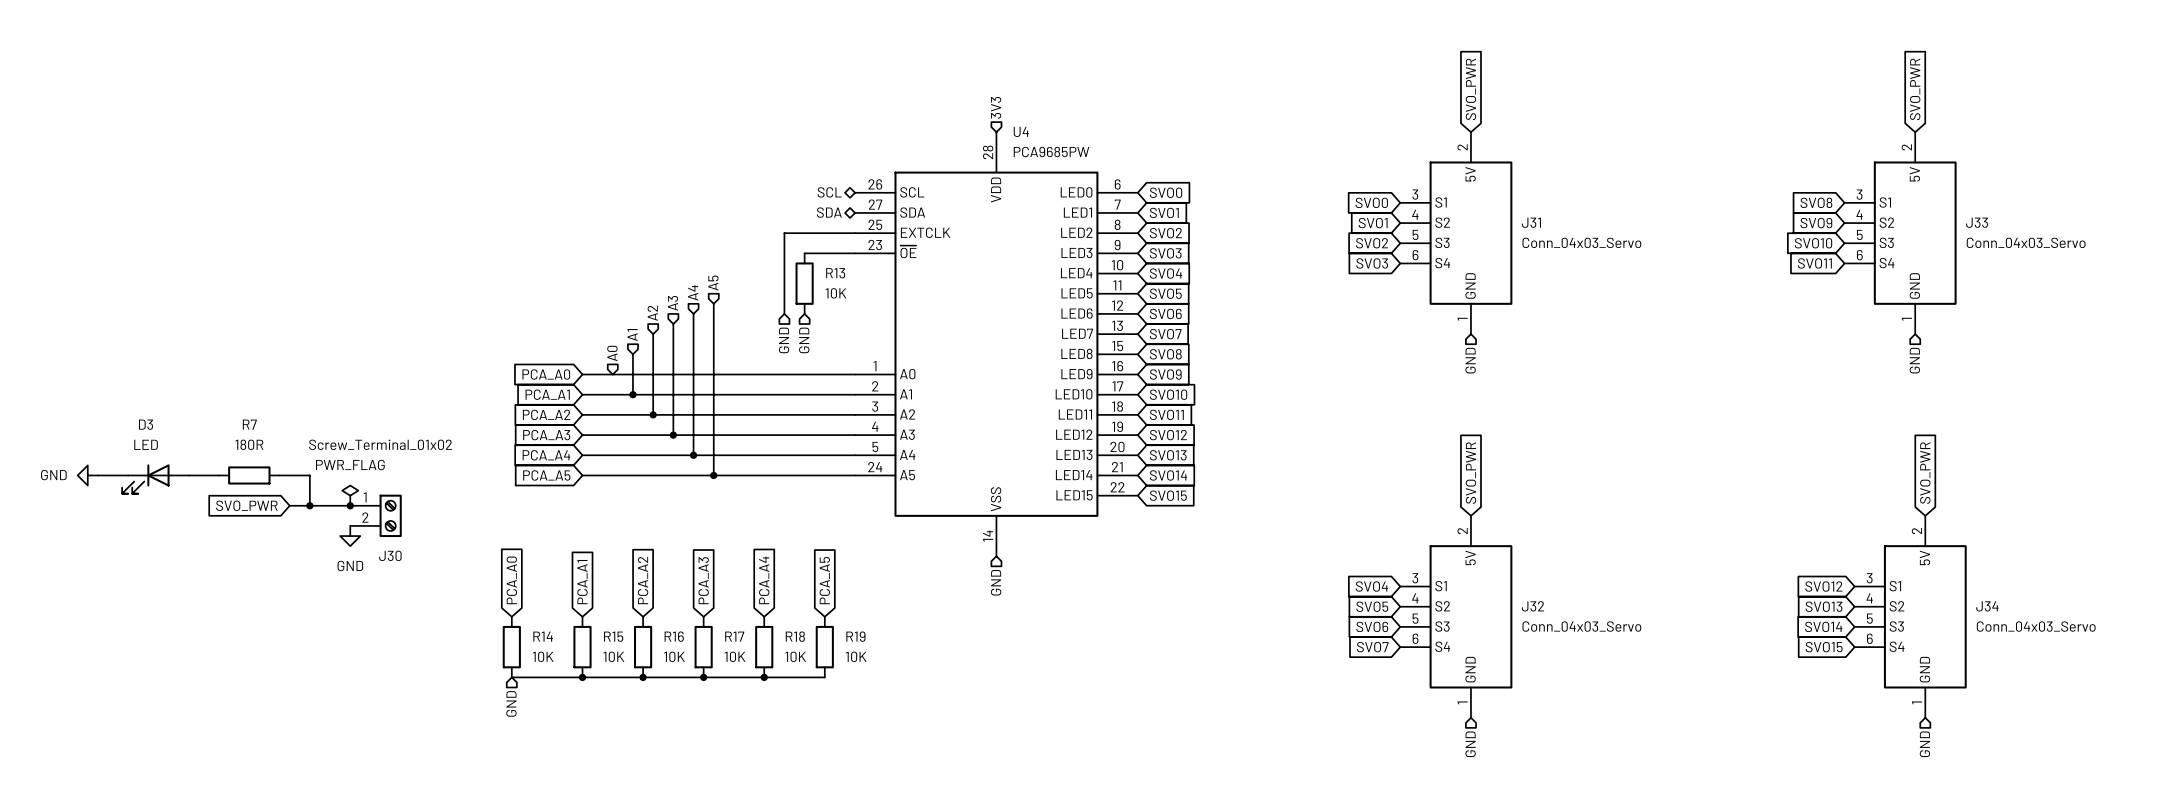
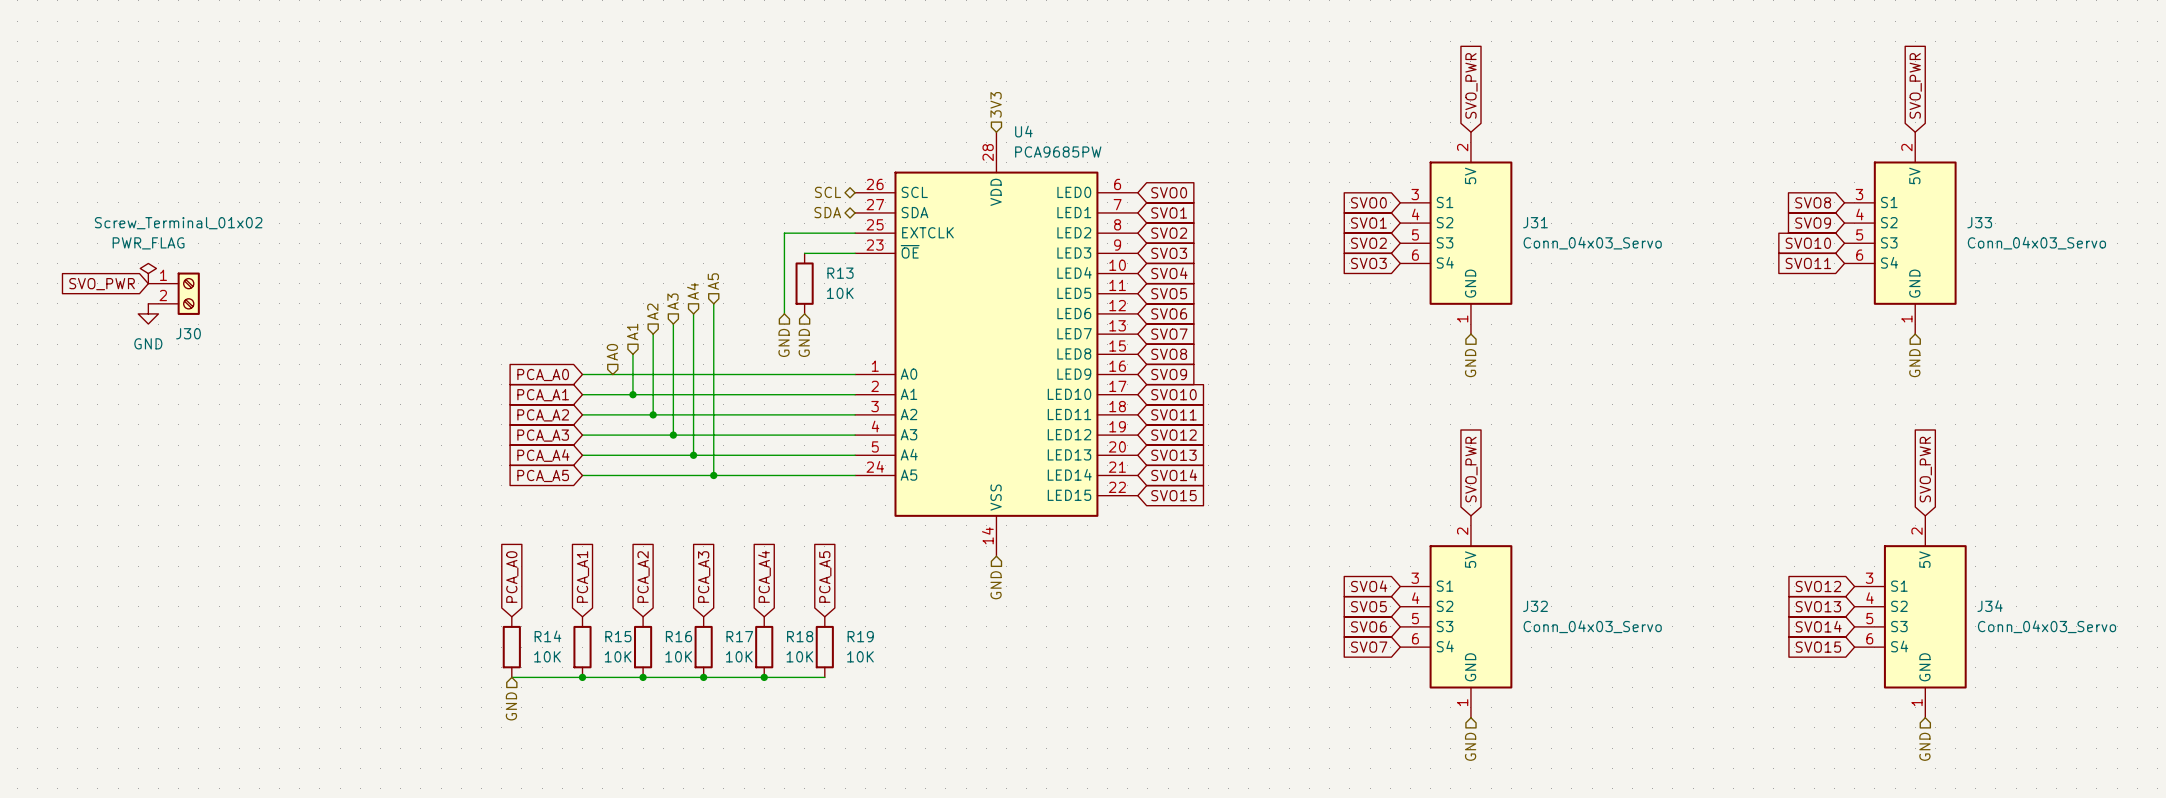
power symbol: none -> PWR_FLAG (148, 273)
global label: none -> SVO_PWR (102, 284)
power symbol: none -> GND (148, 313)
power symbol: GND (87, 475) -> none
wire: (97, 475) (128, 475) -> none
wire: (188, 475) (219, 475) -> none
R7: 180R (249, 475) -> none
wire: (279, 475) (309, 475) (309, 505) -> none
D3: LED (155, 479) -> none
power symbol: PWR_FLAG (350, 495) -> none
global label: SVO_PWR (246, 505) -> none
wire: (289, 505) (350, 505) -> none
junction: (309, 505) -> none
junction: (350, 505) -> none
J30 position: (376, 515) -> (174, 293)
power symbol: GND (350, 536) -> none

